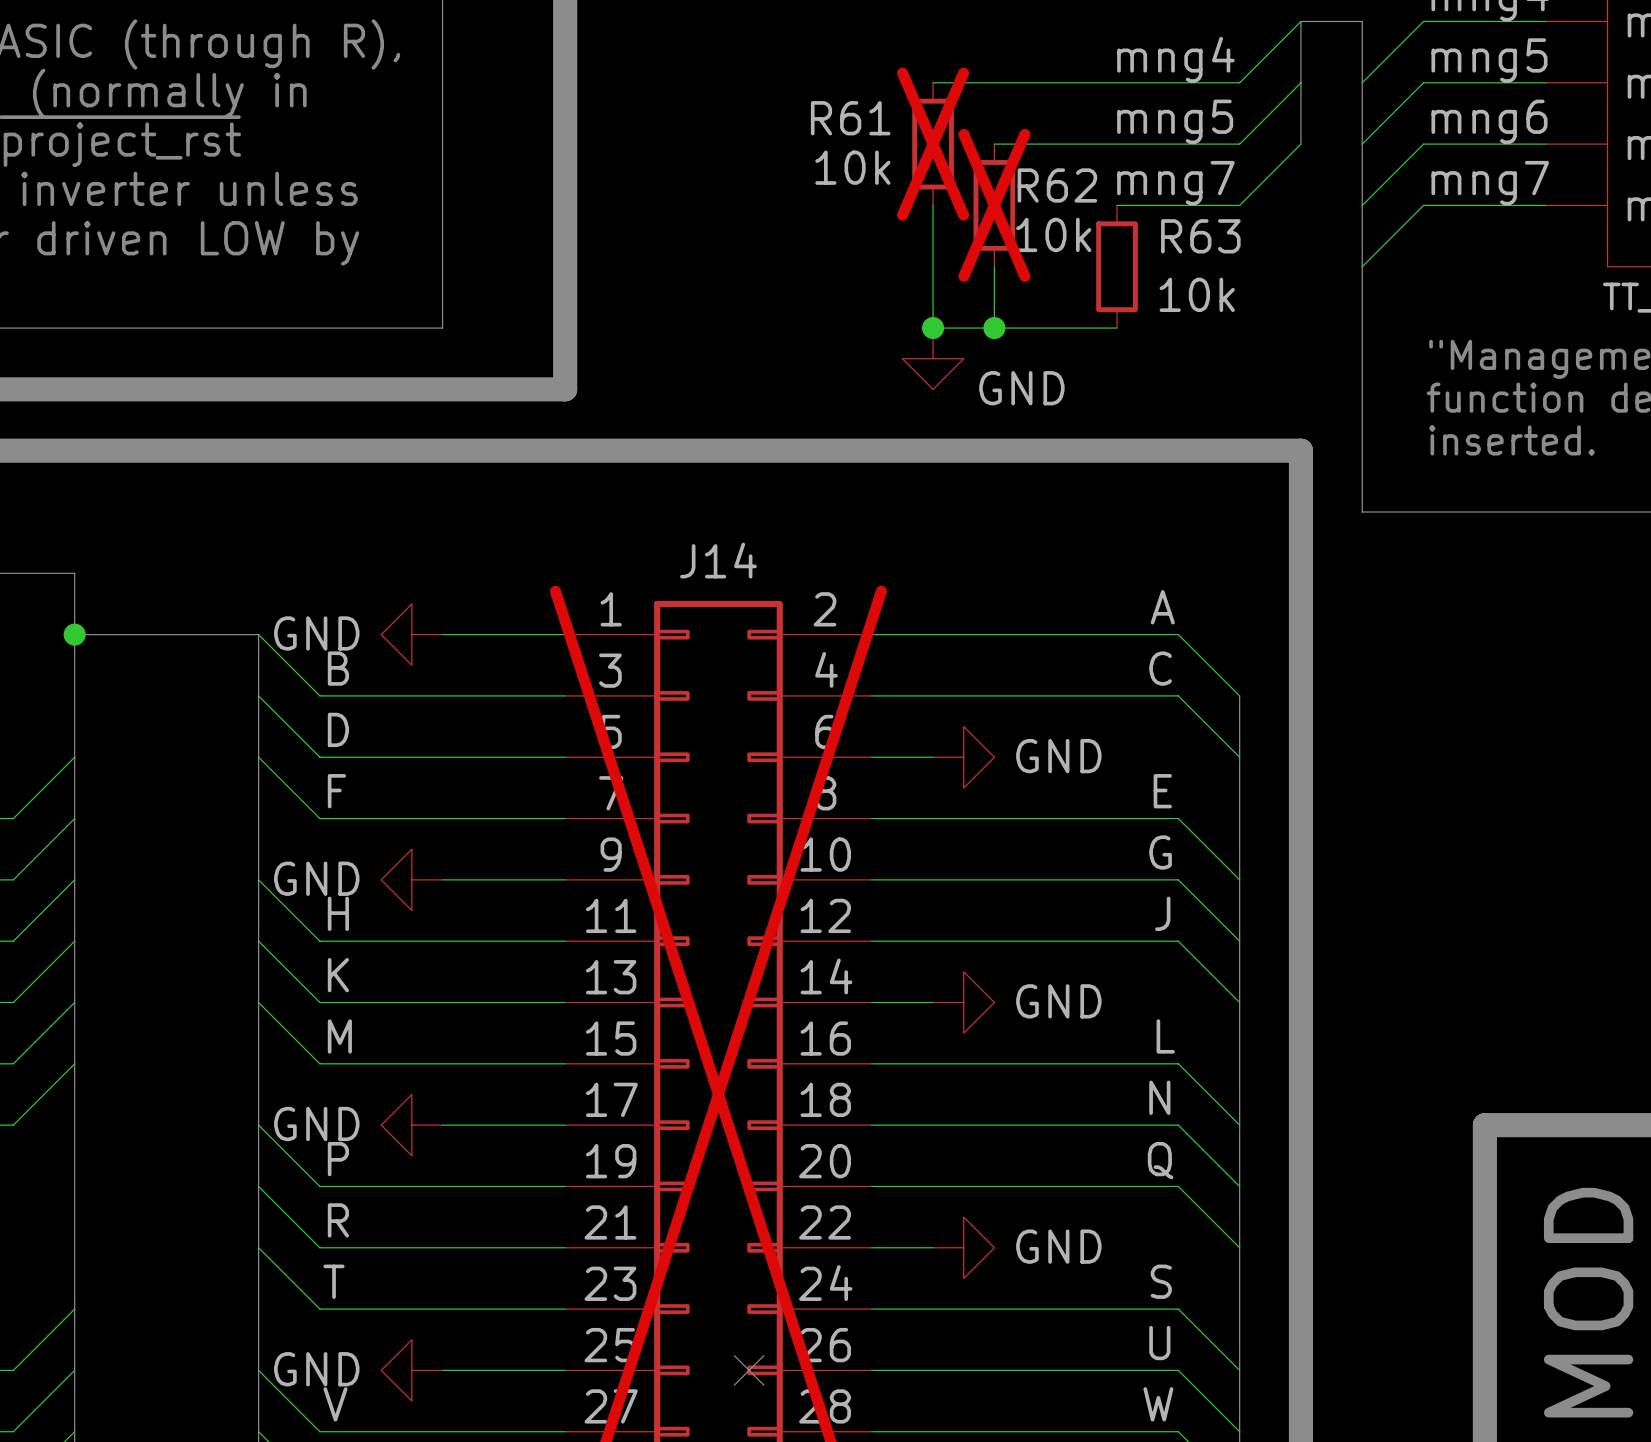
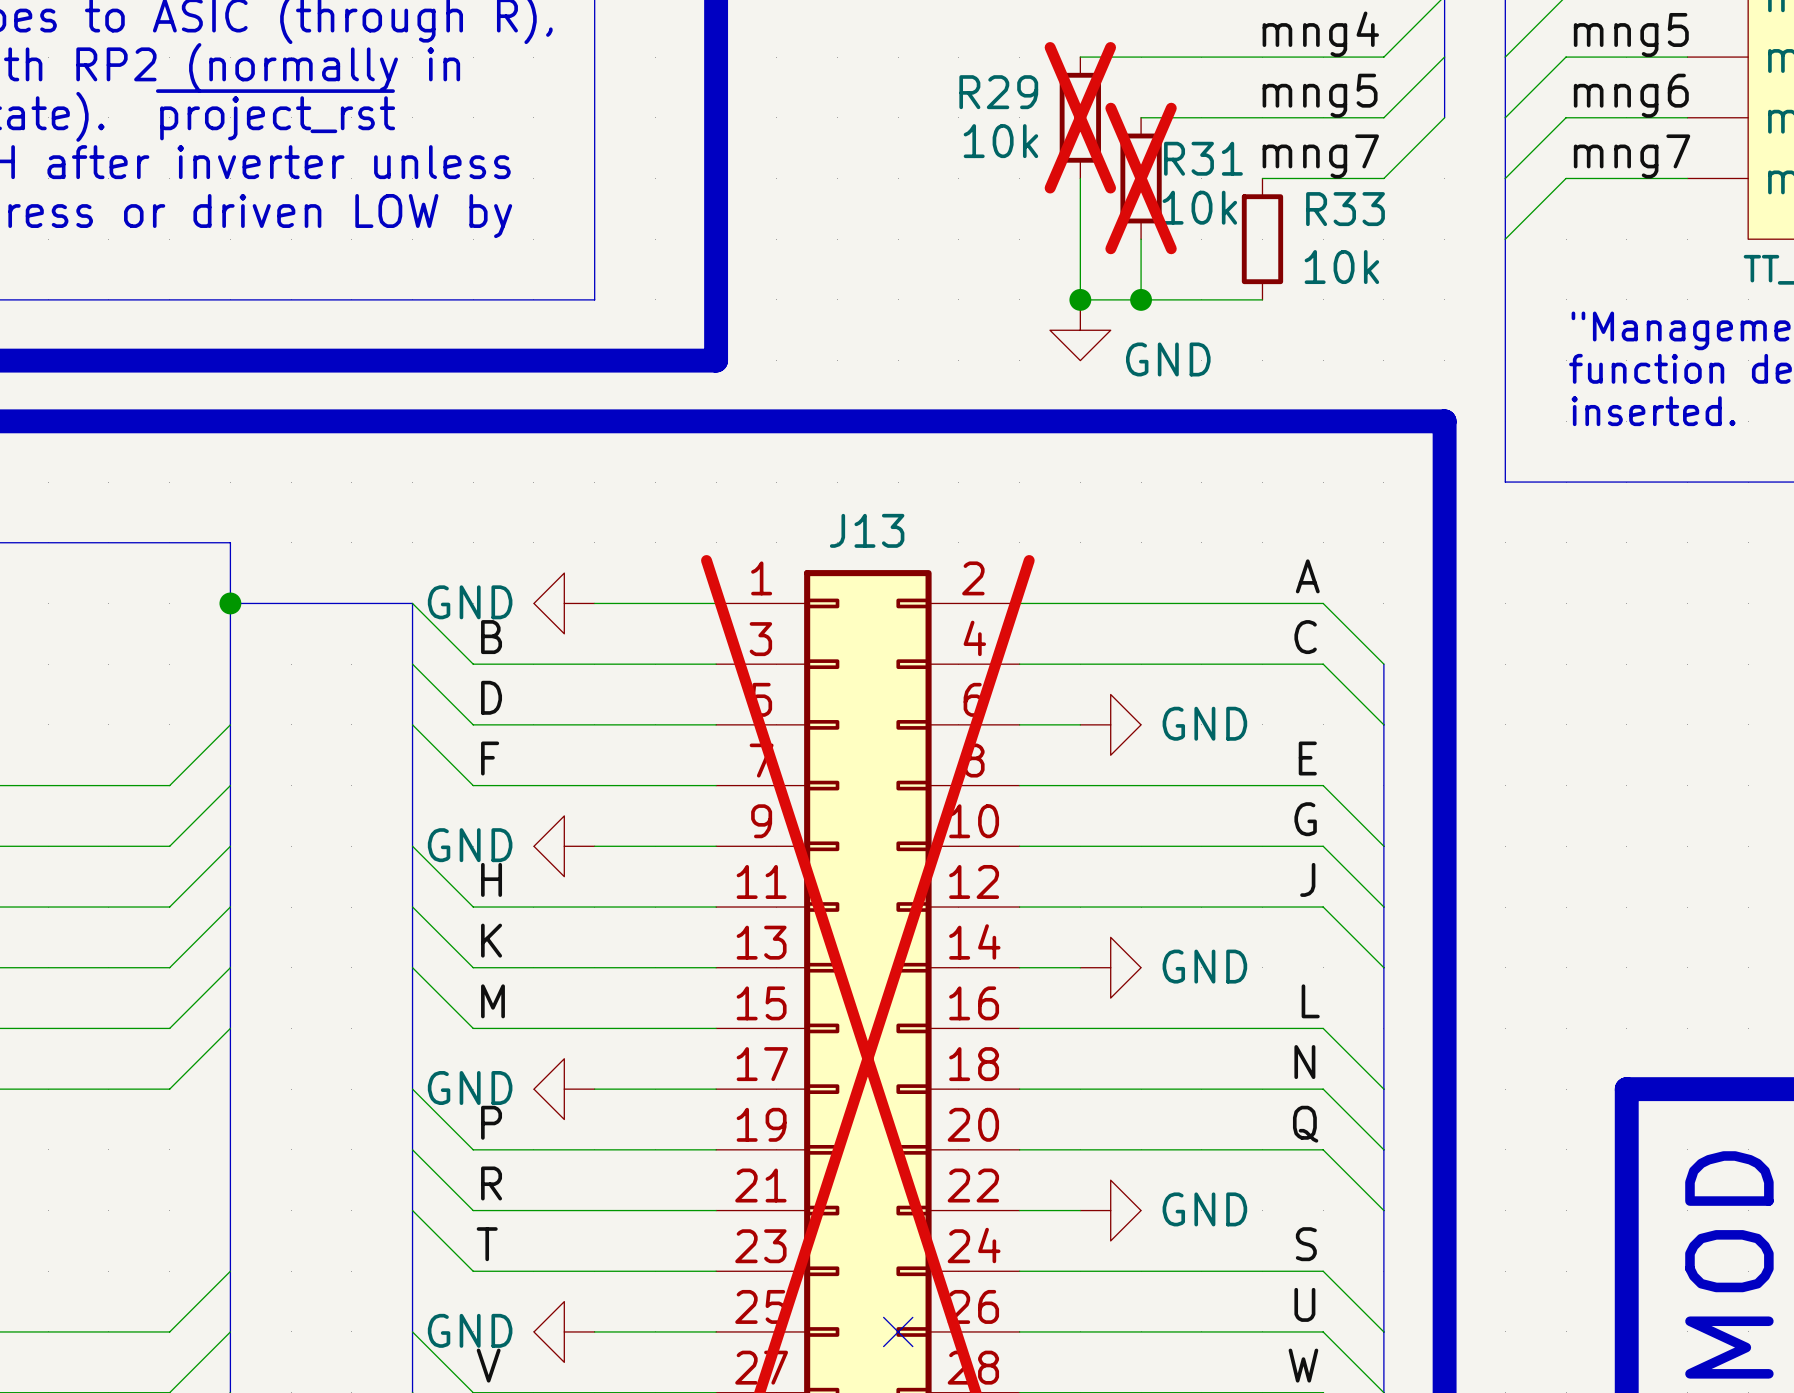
R61 name: R61 (850, 118) -> R29 (998, 92)
R62 name: R62 (1057, 185) -> R31 (1203, 158)
R63 name: R63 (1200, 236) -> R33 (1345, 209)
J14 name: J14 (718, 560) -> J13 (867, 530)

